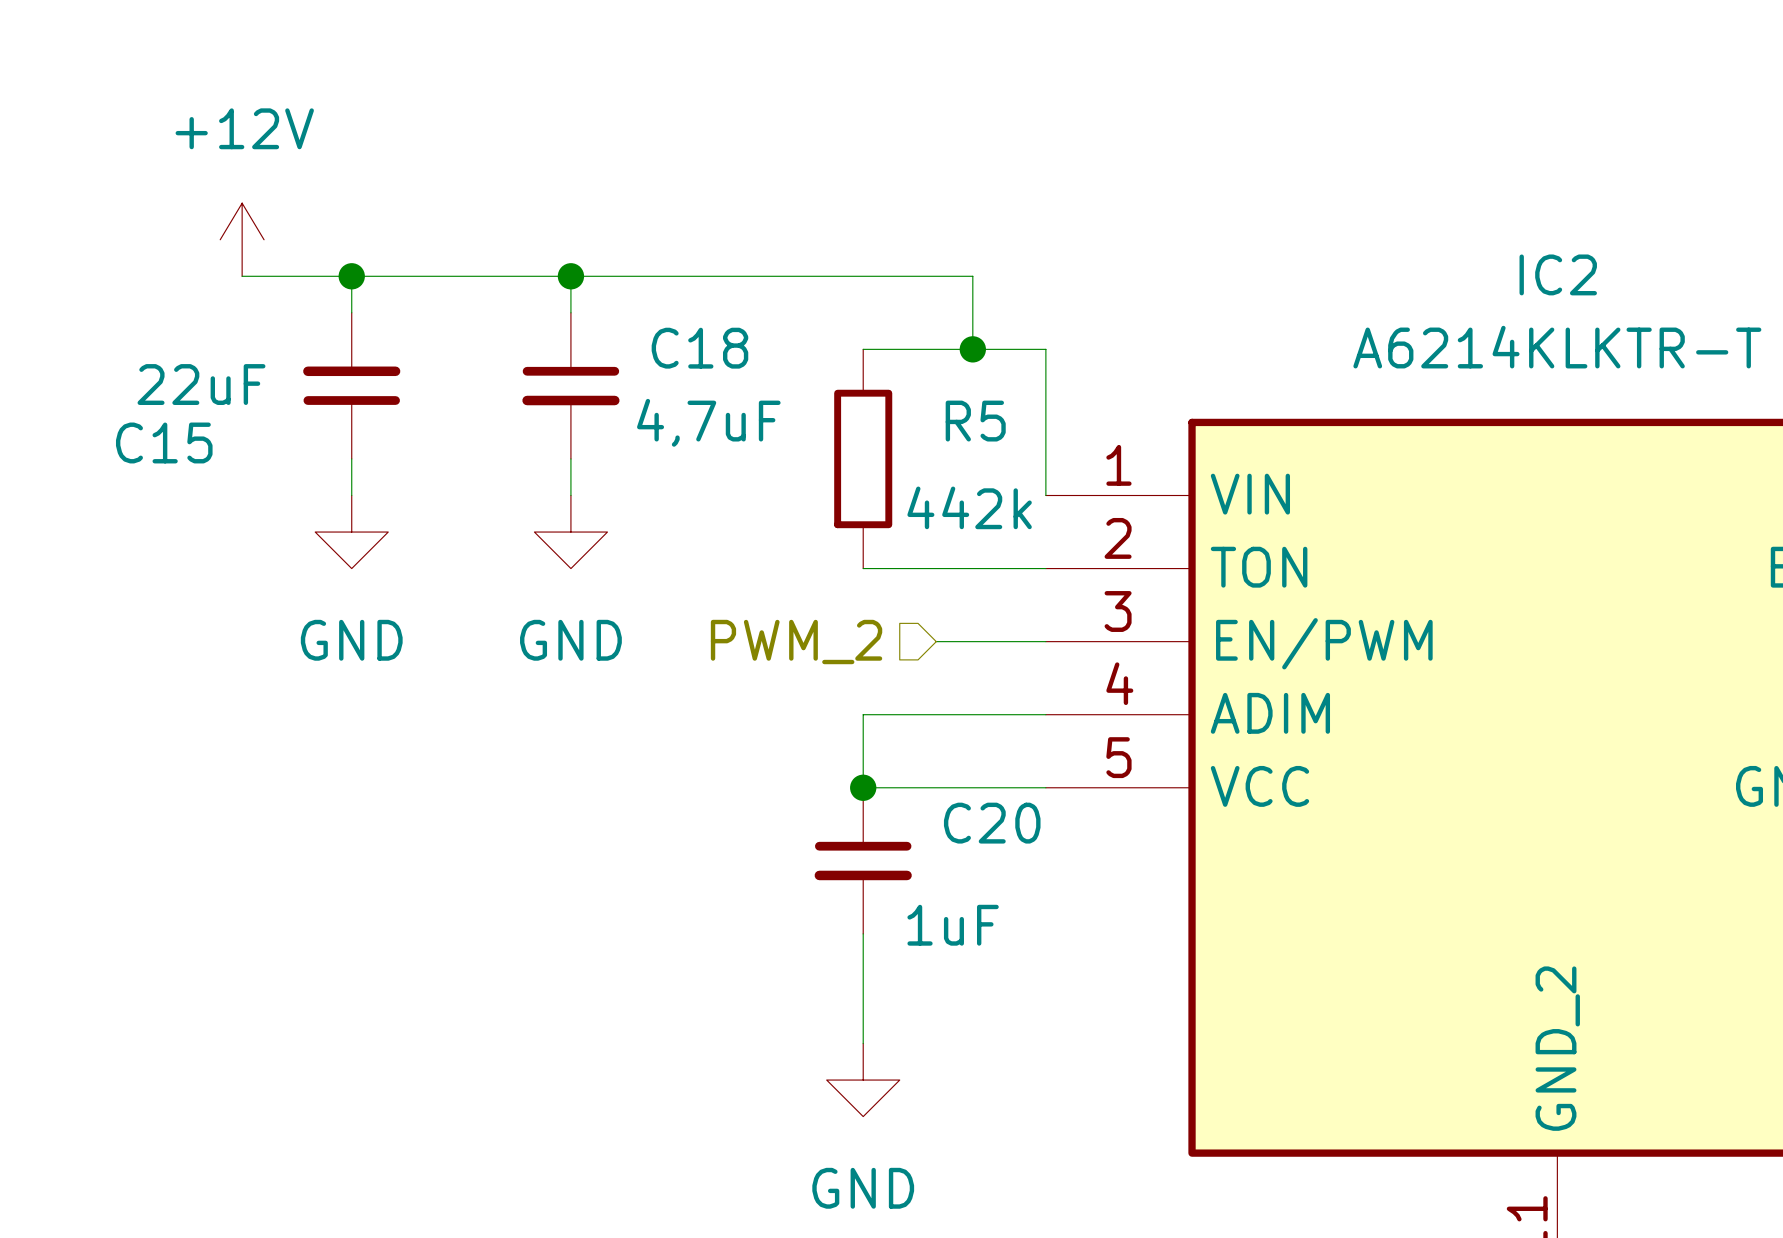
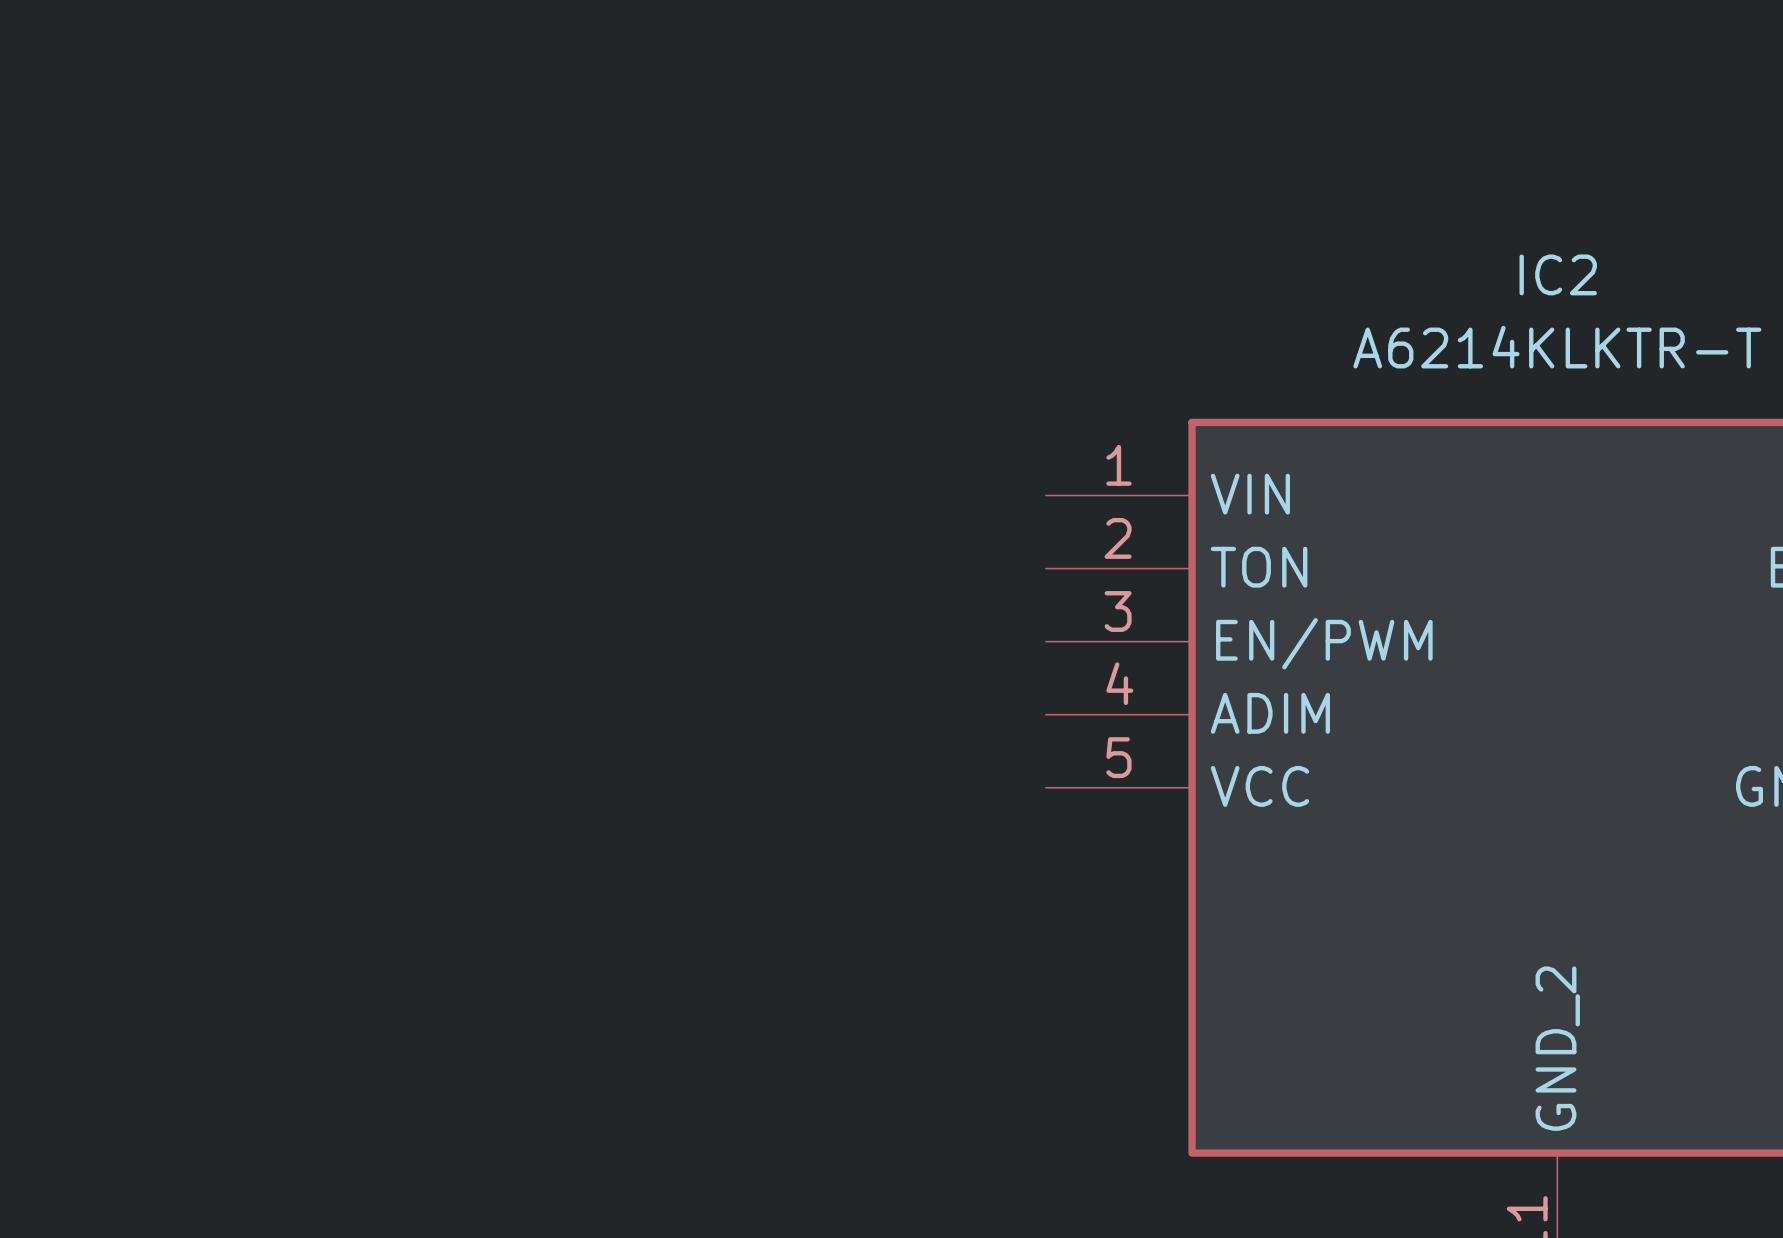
power symbol: +12V (242, 239) -> none
wire: (242, 276) (972, 276) (972, 349) -> none
wire: (351, 276) (351, 312) -> none
junction: (351, 276) -> none
wire: (570, 276) (570, 312) -> none
junction: (570, 276) -> none
wire: (863, 349) (1045, 349) (1045, 495) -> none
junction: (972, 349) -> none
C15: 22uF (351, 385) -> none
C18: 4,7uF (570, 385) -> none
wire: (351, 458) (351, 495) -> none
wire: (570, 458) (570, 495) -> none
R5: 442k (863, 458) -> none
power symbol: GND (351, 532) -> none
power symbol: GND (570, 532) -> none
wire: (863, 568) (1045, 568) -> none
wire: (936, 641) (1045, 641) -> none
hierarchical label: PWM_2 (796, 642) -> none
wire: (1045, 714) (863, 714) (863, 787) (1045, 787) -> none
junction: (863, 787) -> none
C20: 1uF (863, 860) -> none
wire: (863, 933) (863, 1043) -> none
power symbol: GND (863, 1080) -> none

